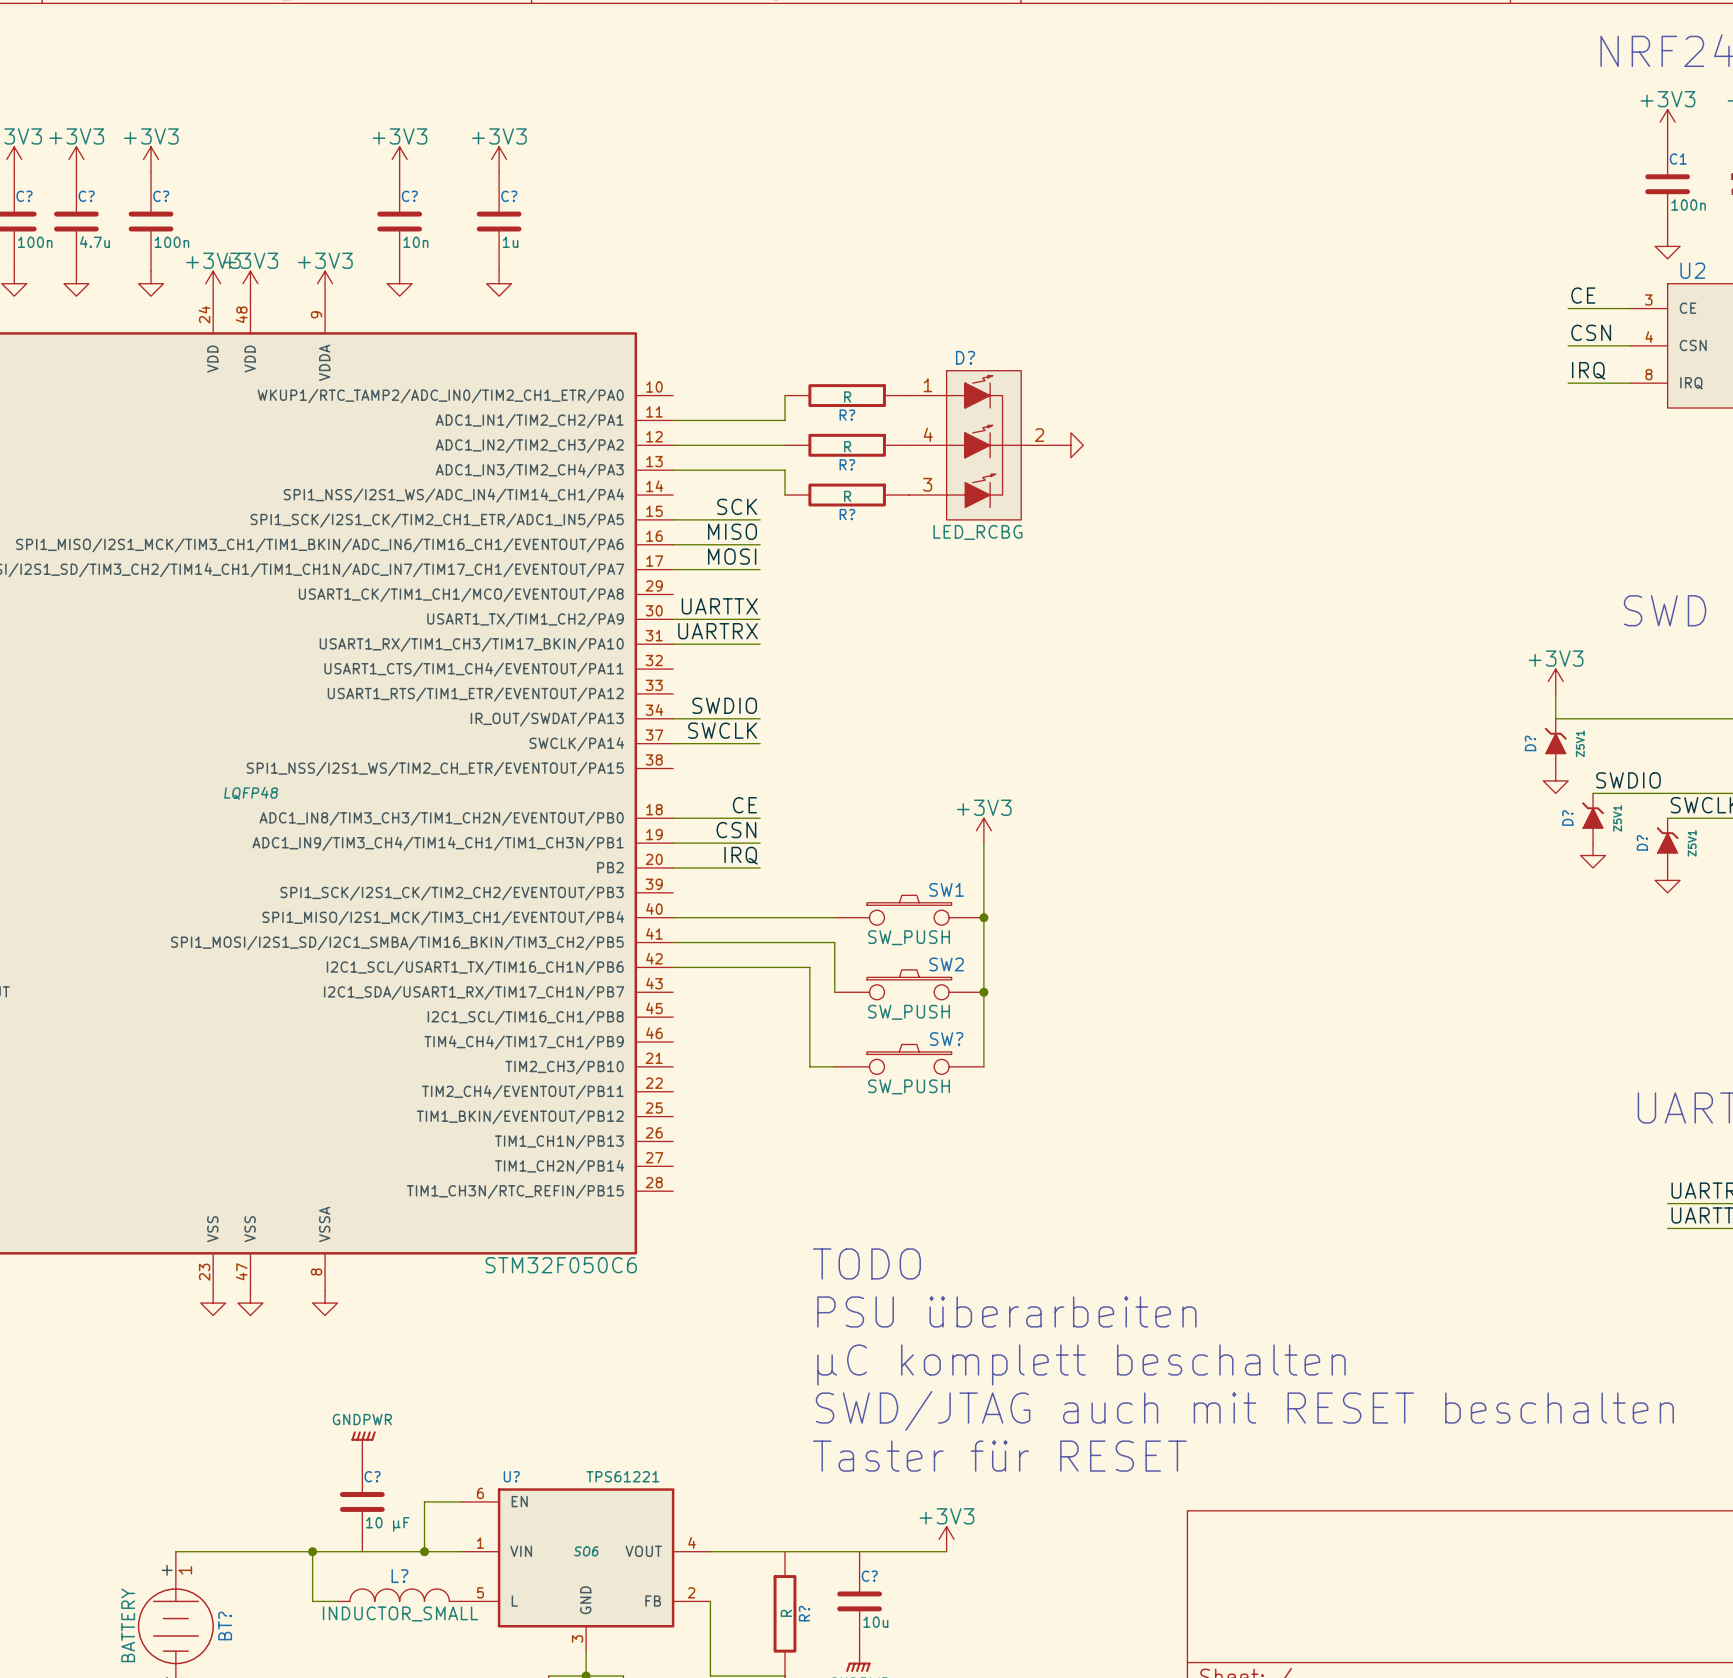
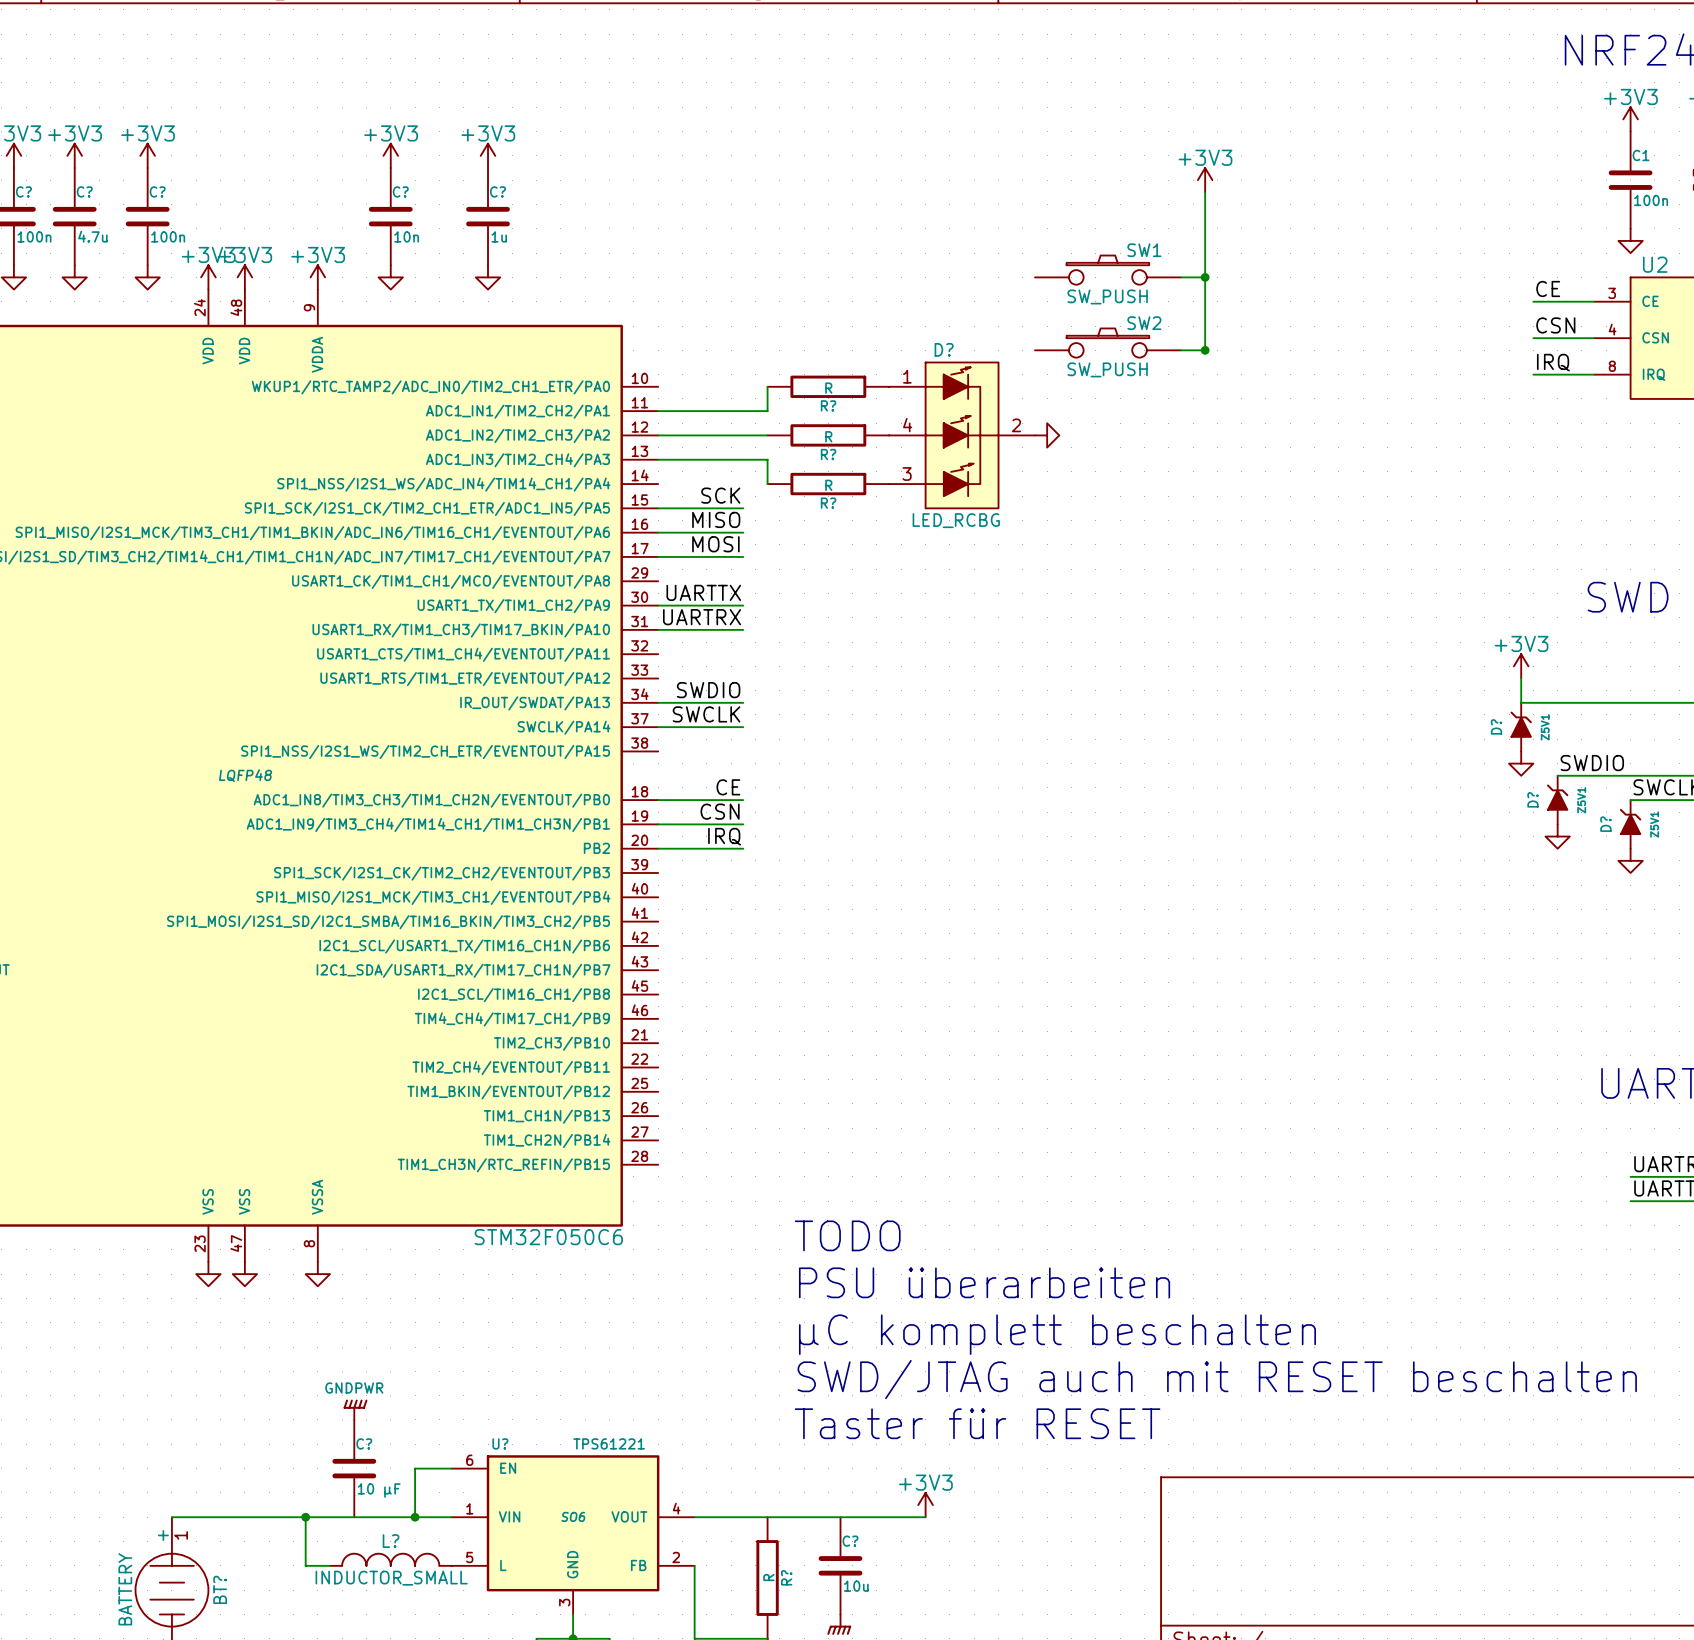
power symbol: none -> +3V3 (1205, 180)
wire: none -> (1205, 192) (1205, 350) (1180, 350)
wire: none -> (1180, 277) (1205, 277)
junction: none -> (1205, 277)
junction: none -> (1205, 350)
power symbol: +3V3 (983, 830) -> none
wire: (983, 843) (983, 1066) -> none
SW1 position: (909, 910) -> (1107, 270)
wire: (673, 917) (834, 917) -> none
junction: (983, 917) -> none
wire: (673, 942) (834, 942) (834, 992) -> none
wire: (673, 967) (809, 967) (809, 1066) (834, 1066) -> none
SW2 position: (909, 984) -> (1107, 343)
junction: (983, 992) -> none
SW?: SW_PUSH (909, 1059) -> none

